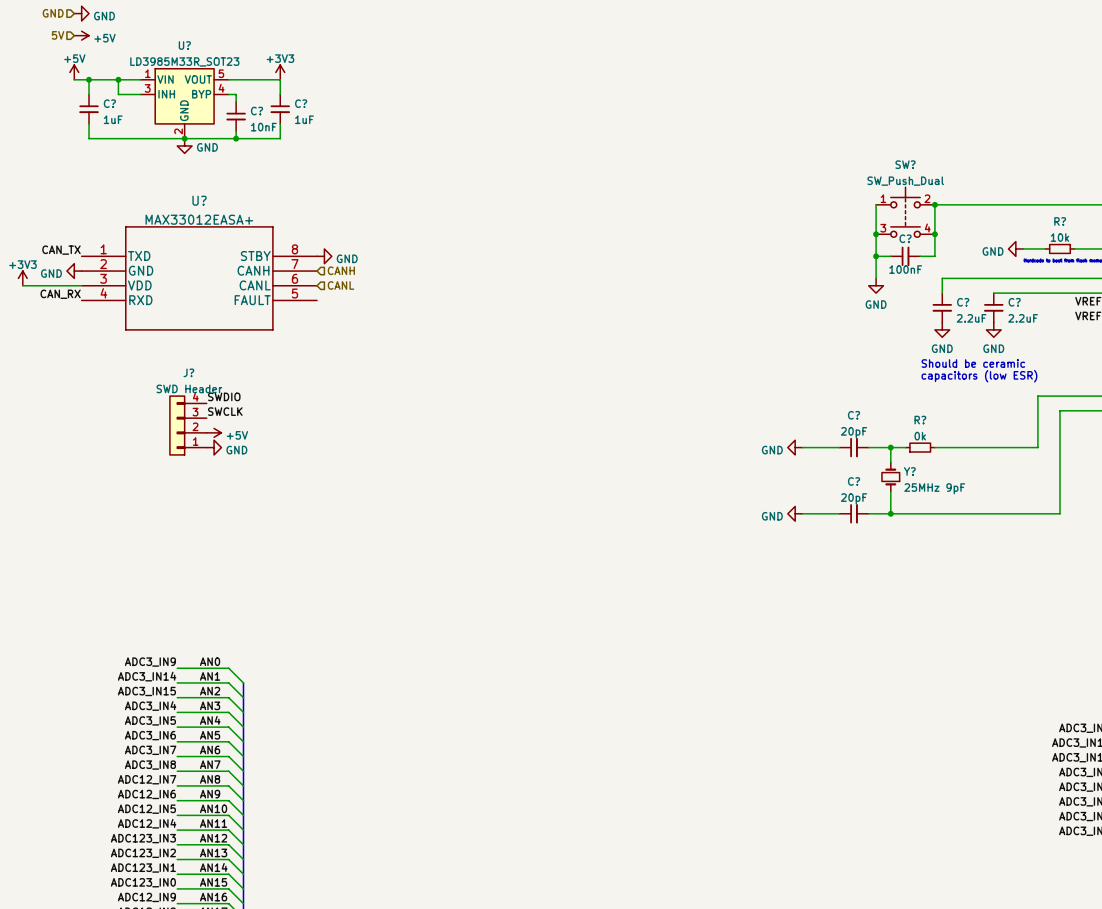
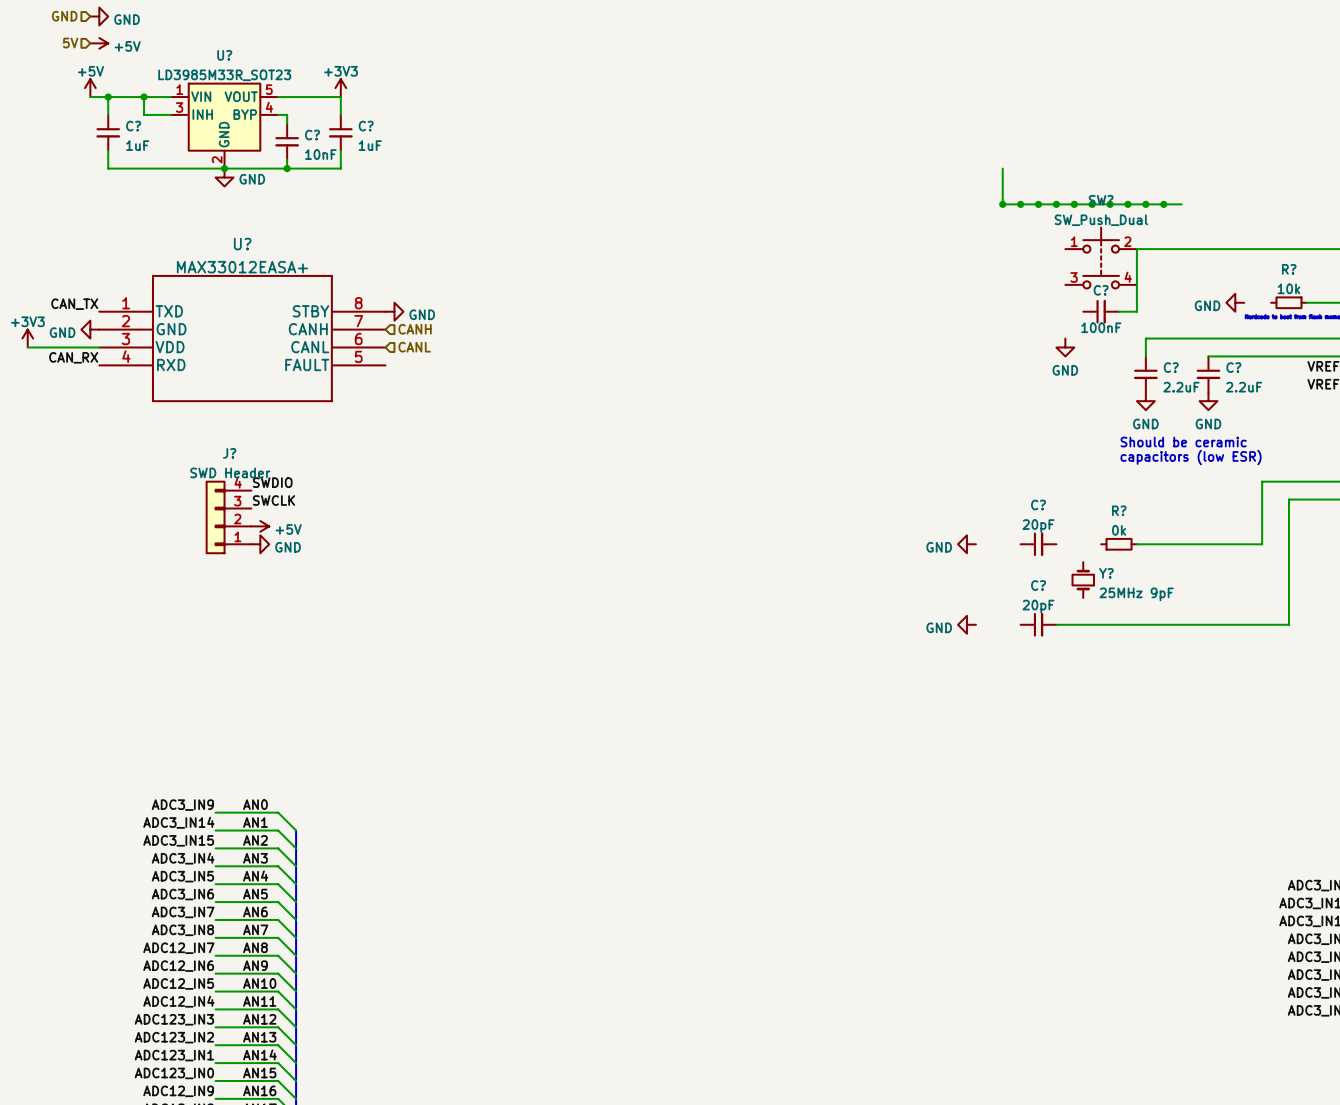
wire: none -> (1002, 168) (1002, 204) (1181, 204)
junction: none -> (1002, 204)
junction: none -> (1020, 204)
junction: none -> (1038, 204)
junction: none -> (1056, 204)
junction: none -> (1074, 204)
junction: none -> (1092, 204)
junction: none -> (1110, 204)
junction: none -> (1127, 204)
junction: none -> (1145, 204)
junction: none -> (1163, 204)
wire: (876, 204) (876, 278) -> none
junction: (934, 204) -> none
junction: (876, 234) -> none
junction: (934, 234) -> none
wire: (1023, 248) (1045, 248) -> none
wire: (876, 256) (890, 256) -> none
junction: (876, 256) -> none
wire: (802, 447) (839, 447) -> none
wire: (868, 447) (905, 447) -> none
wire: (890, 447) (890, 462) -> none
junction: (890, 447) -> none
wire: (890, 491) (890, 513) -> none
wire: (802, 513) (839, 513) -> none
junction: (890, 513) -> none

